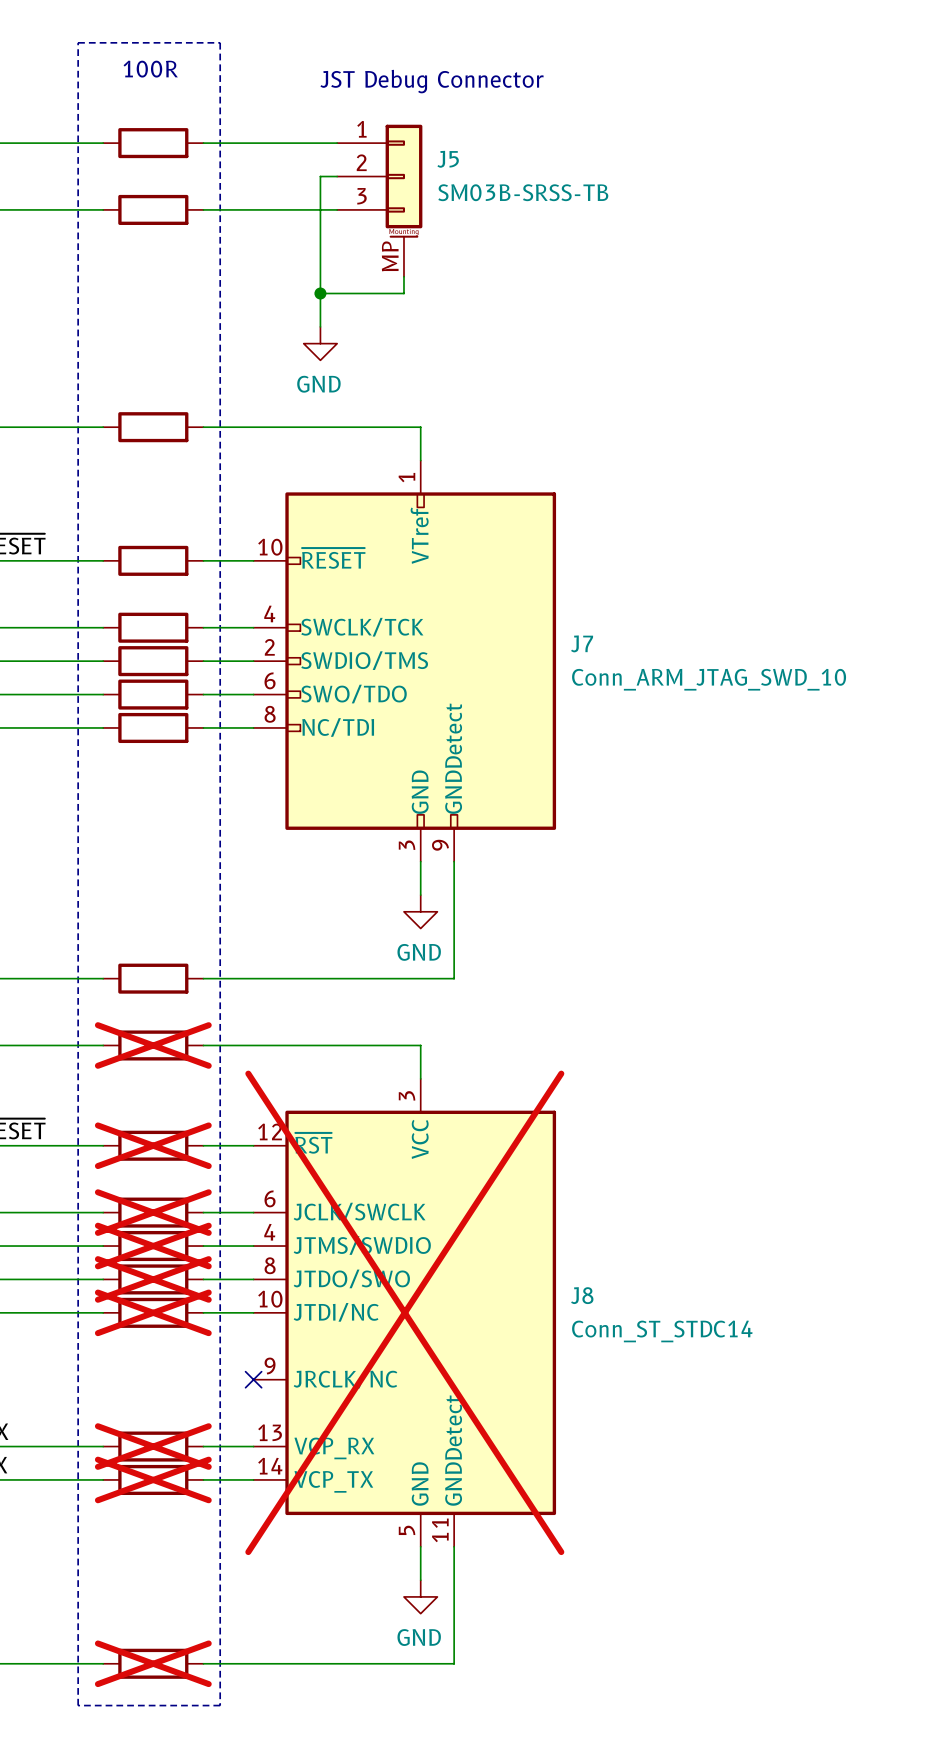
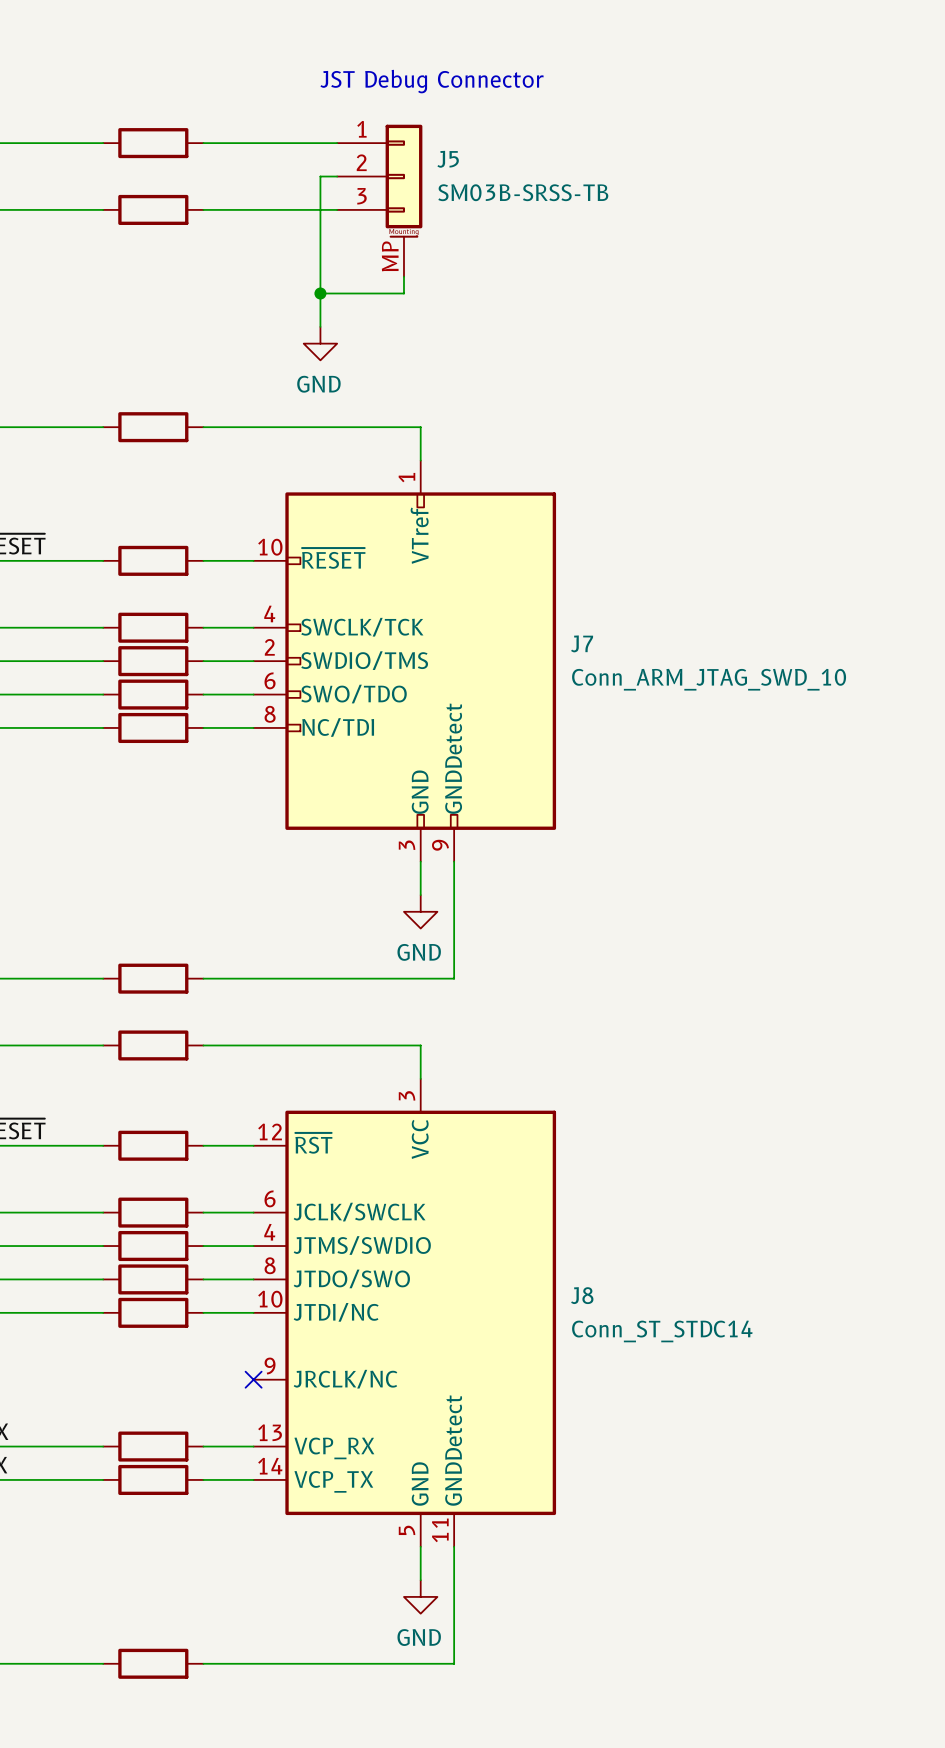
line: (78, 42) (220, 42) (220, 1705) (78, 1705) (78, 42) -> none
text: 100R (150, 69) -> none
part do-not-place cross: (153, 1045) -> none
part do-not-place cross: (153, 1145) -> none
part do-not-place cross: (153, 1212) -> none
part do-not-place cross: (153, 1246) -> none
part do-not-place cross: (153, 1279) -> none
part do-not-place cross: (153, 1312) -> none
J8 do-not-place cross: (404, 1312) -> none
part do-not-place cross: (153, 1446) -> none
part do-not-place cross: (153, 1479) -> none
part do-not-place cross: (153, 1663) -> none

